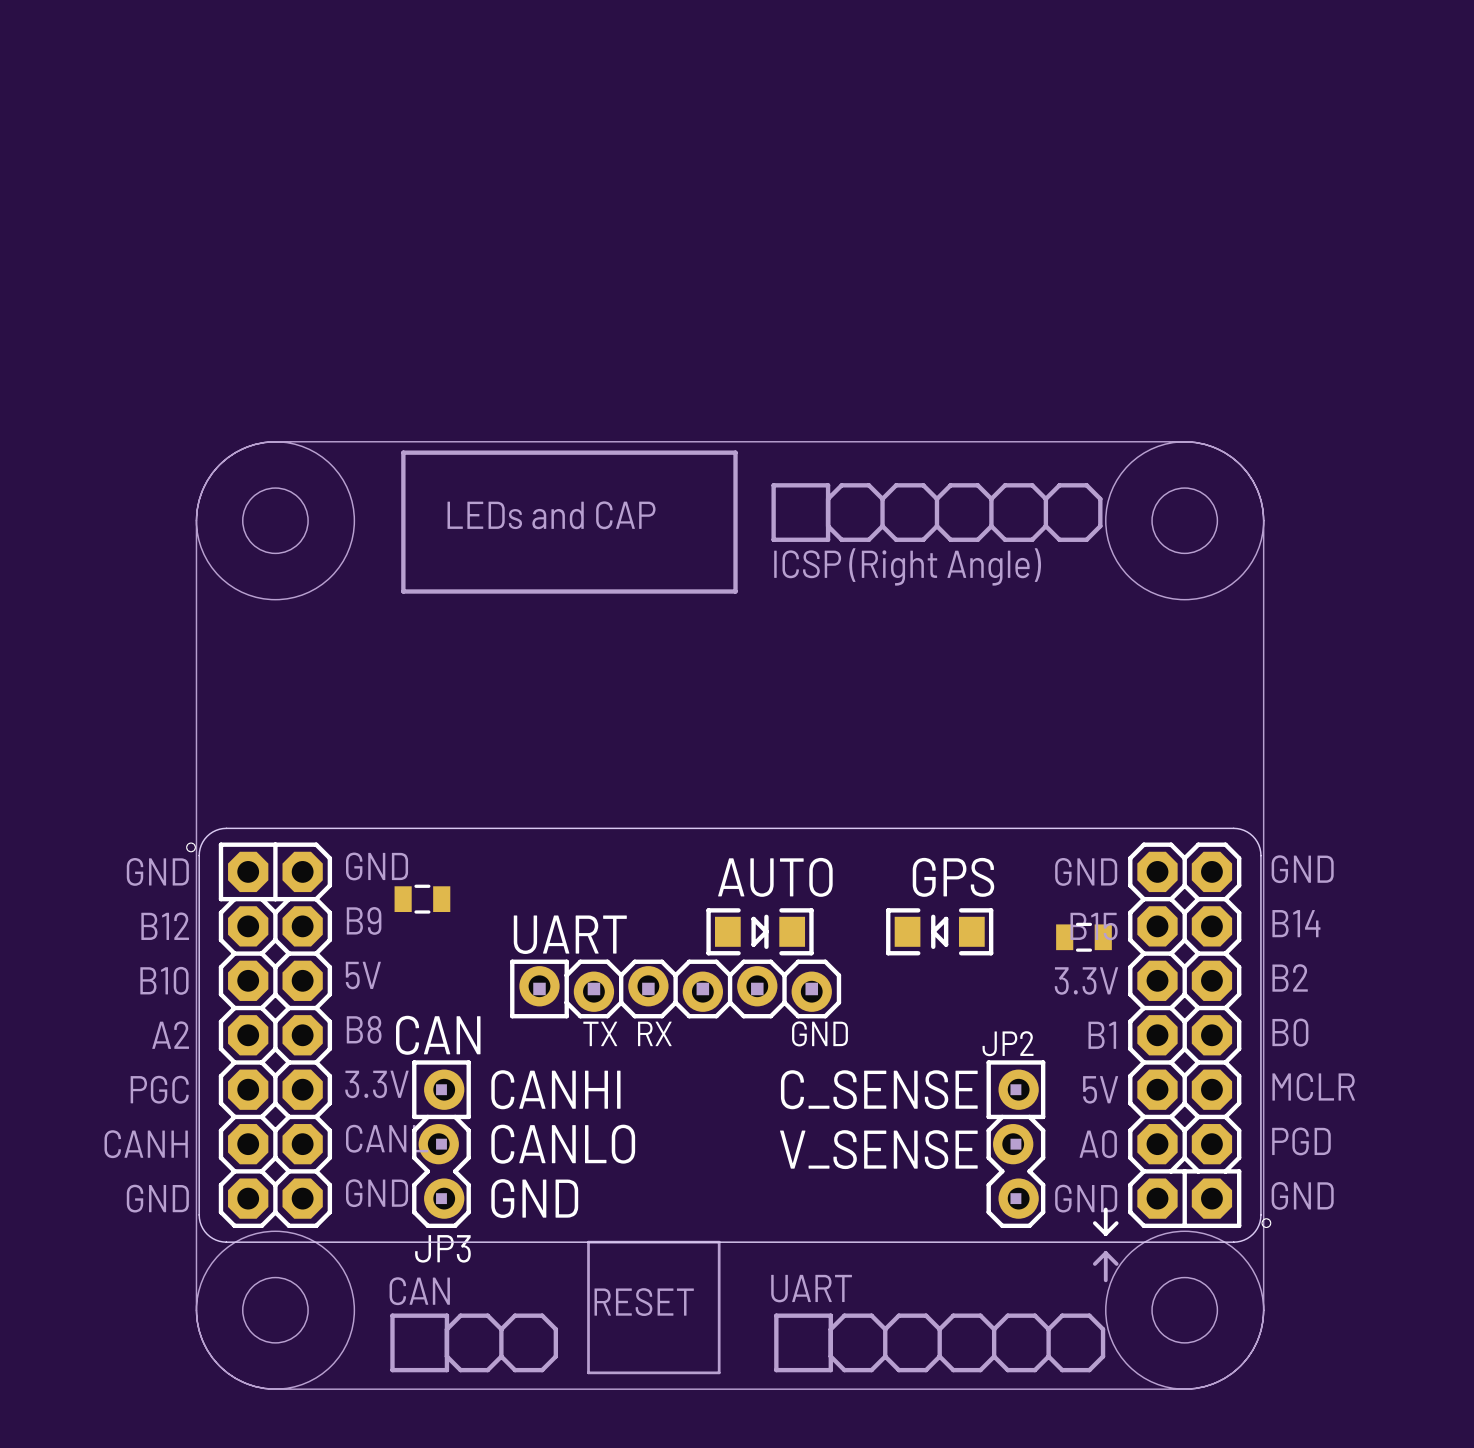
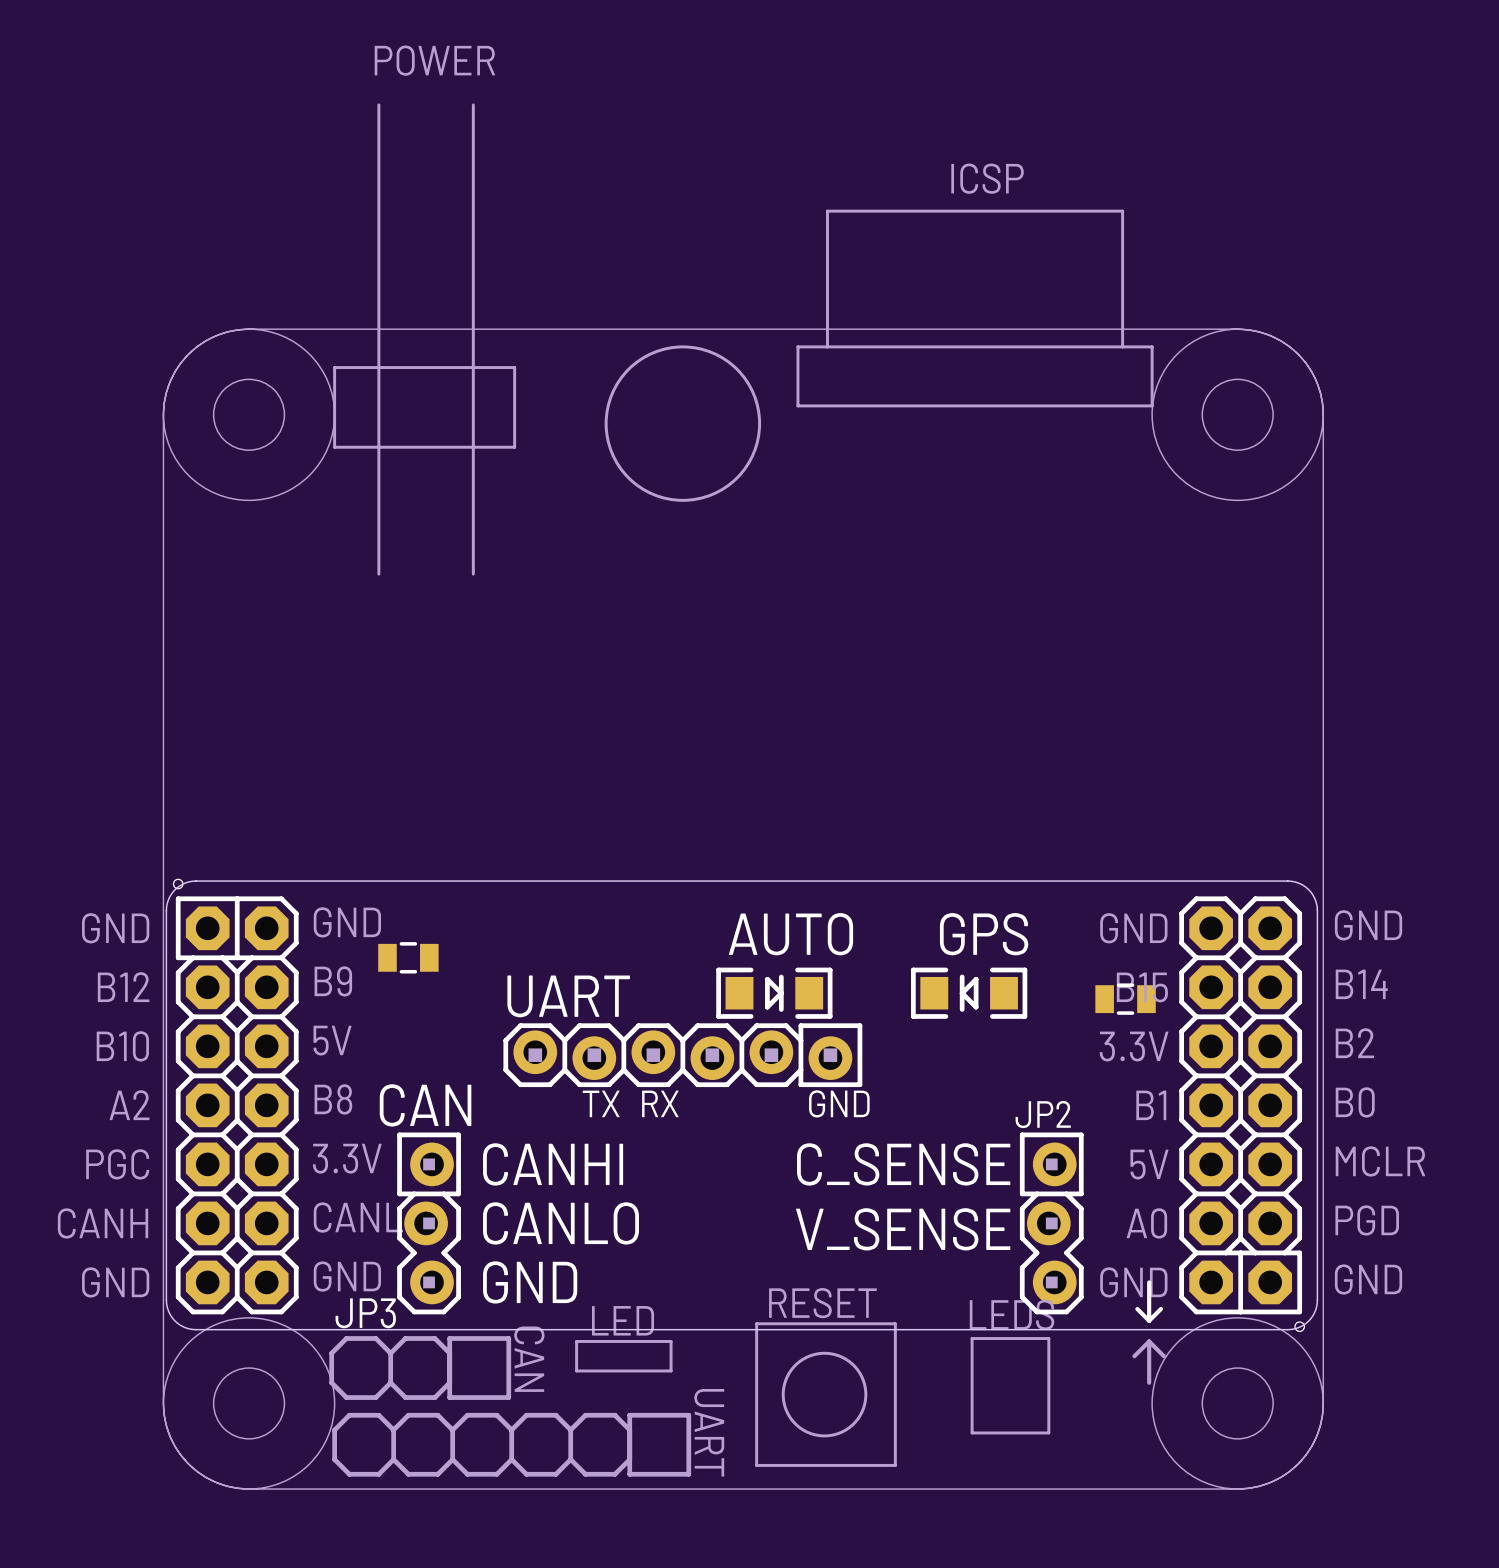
part: none -> (743, 796)
part: (728, 915) -> none
part rotation: 0° (675, 988) -> 180° (682, 1055)
line: none -> (1149, 1282) (1149, 1294)
JP3 name position: JP3 (442, 1248) -> JP3 (365, 1313)

